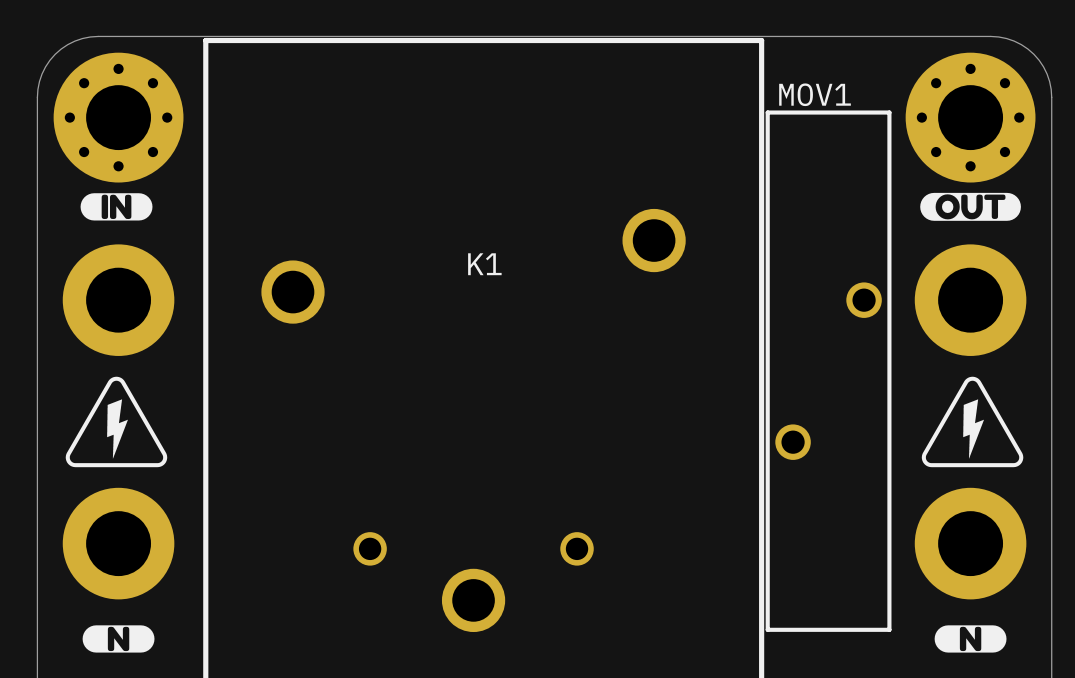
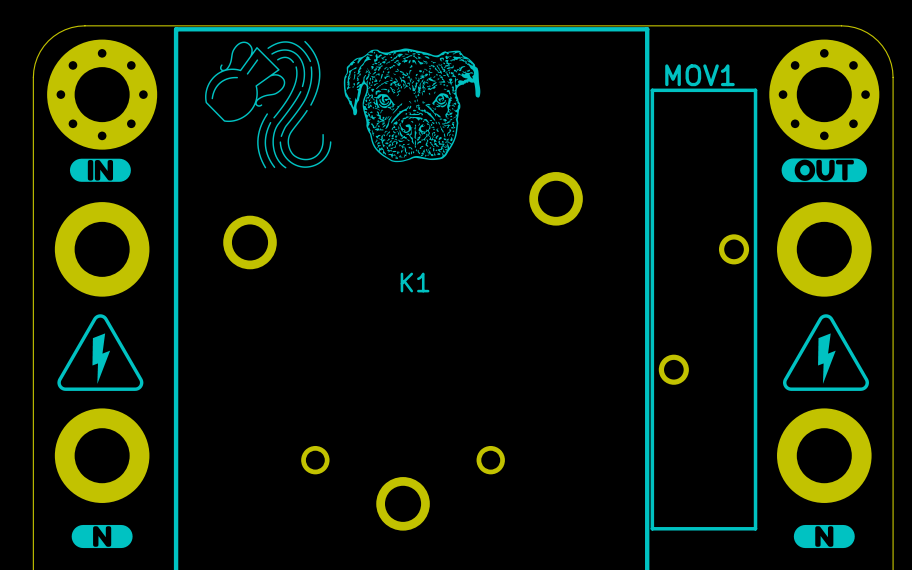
drawing: none -> [205, 40, 481, 169]
K1 name position: K1 (484, 264) -> K1 (415, 282)

